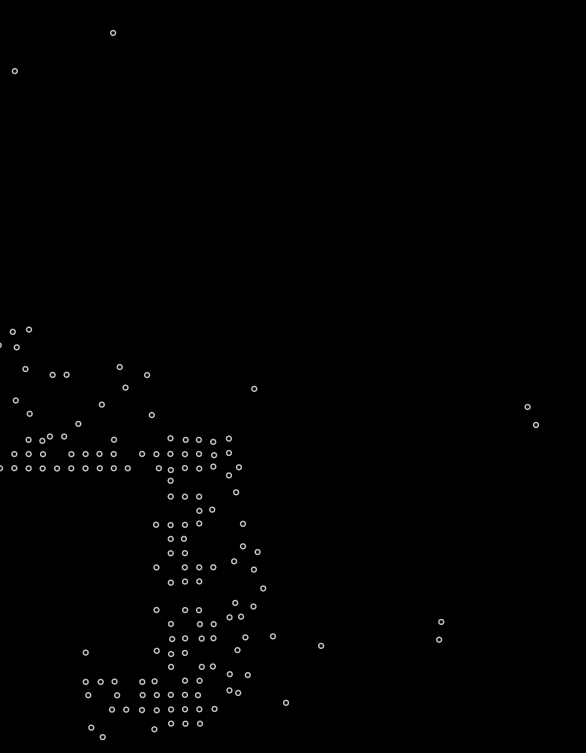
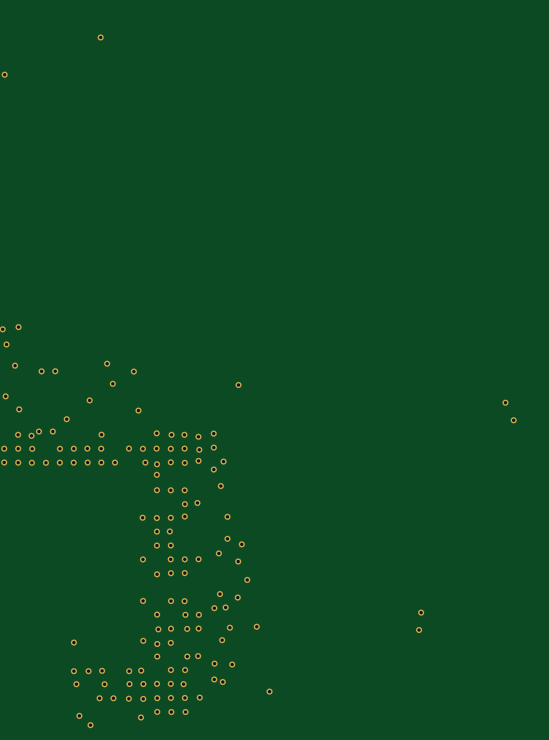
via: (321, 645) -> none

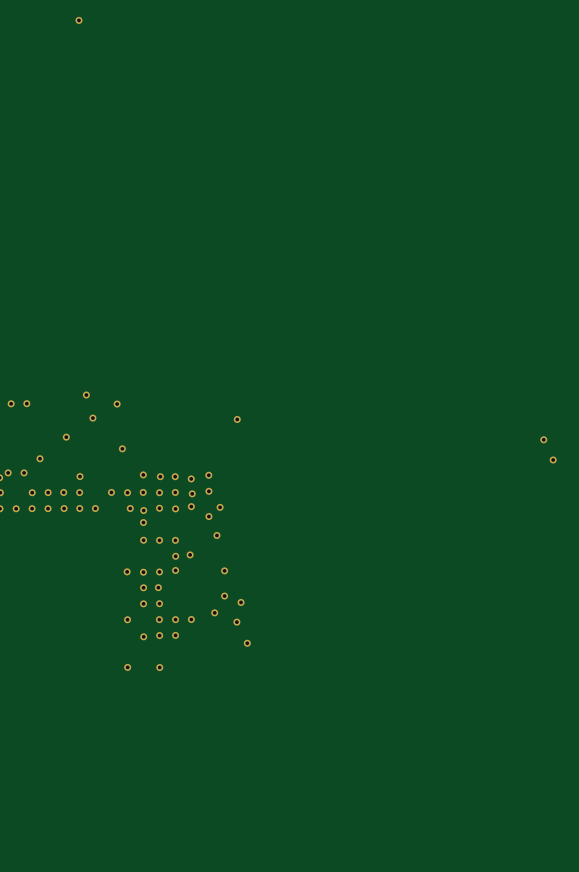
via: (219, 594) -> none
via: (237, 597) -> none
via: (184, 601) -> none
via: (225, 607) -> none
via: (214, 608) -> none
via: (421, 612) -> none
via: (157, 614) -> none
via: (185, 614) -> none
via: (198, 614) -> none
via: (256, 626) -> none
via: (229, 627) -> none
via: (171, 628) -> none
via: (187, 628) -> none
via: (198, 628) -> none
via: (158, 629) -> none
via: (419, 630) -> none
via: (143, 640) -> none
via: (222, 640) -> none
via: (73, 642) -> none
via: (170, 642) -> none
via: (157, 643) -> none
via: (157, 656) -> none
via: (187, 656) -> none
via: (198, 656) -> none
via: (214, 663) -> none
via: (232, 664) -> none
via: (170, 669) -> none
via: (102, 670) -> none
via: (141, 670) -> none
via: (185, 670) -> none
via: (73, 671) -> none
via: (88, 671) -> none
via: (129, 671) -> none
via: (214, 679) -> none
via: (222, 681) -> none
via: (157, 683) -> none
via: (170, 683) -> none
via: (76, 684) -> none
via: (104, 684) -> none
via: (129, 684) -> none
via: (143, 684) -> none
via: (183, 684) -> none
via: (269, 691) -> none
via: (170, 697) -> none
via: (184, 697) -> none
via: (199, 697) -> none
via: (99, 698) -> none
via: (113, 698) -> none
via: (128, 698) -> none
via: (143, 698) -> none
via: (157, 698) -> none
via: (157, 711) -> none
via: (171, 712) -> none
via: (185, 712) -> none
via: (79, 715) -> none
via: (140, 717) -> none
via: (90, 725) -> none

